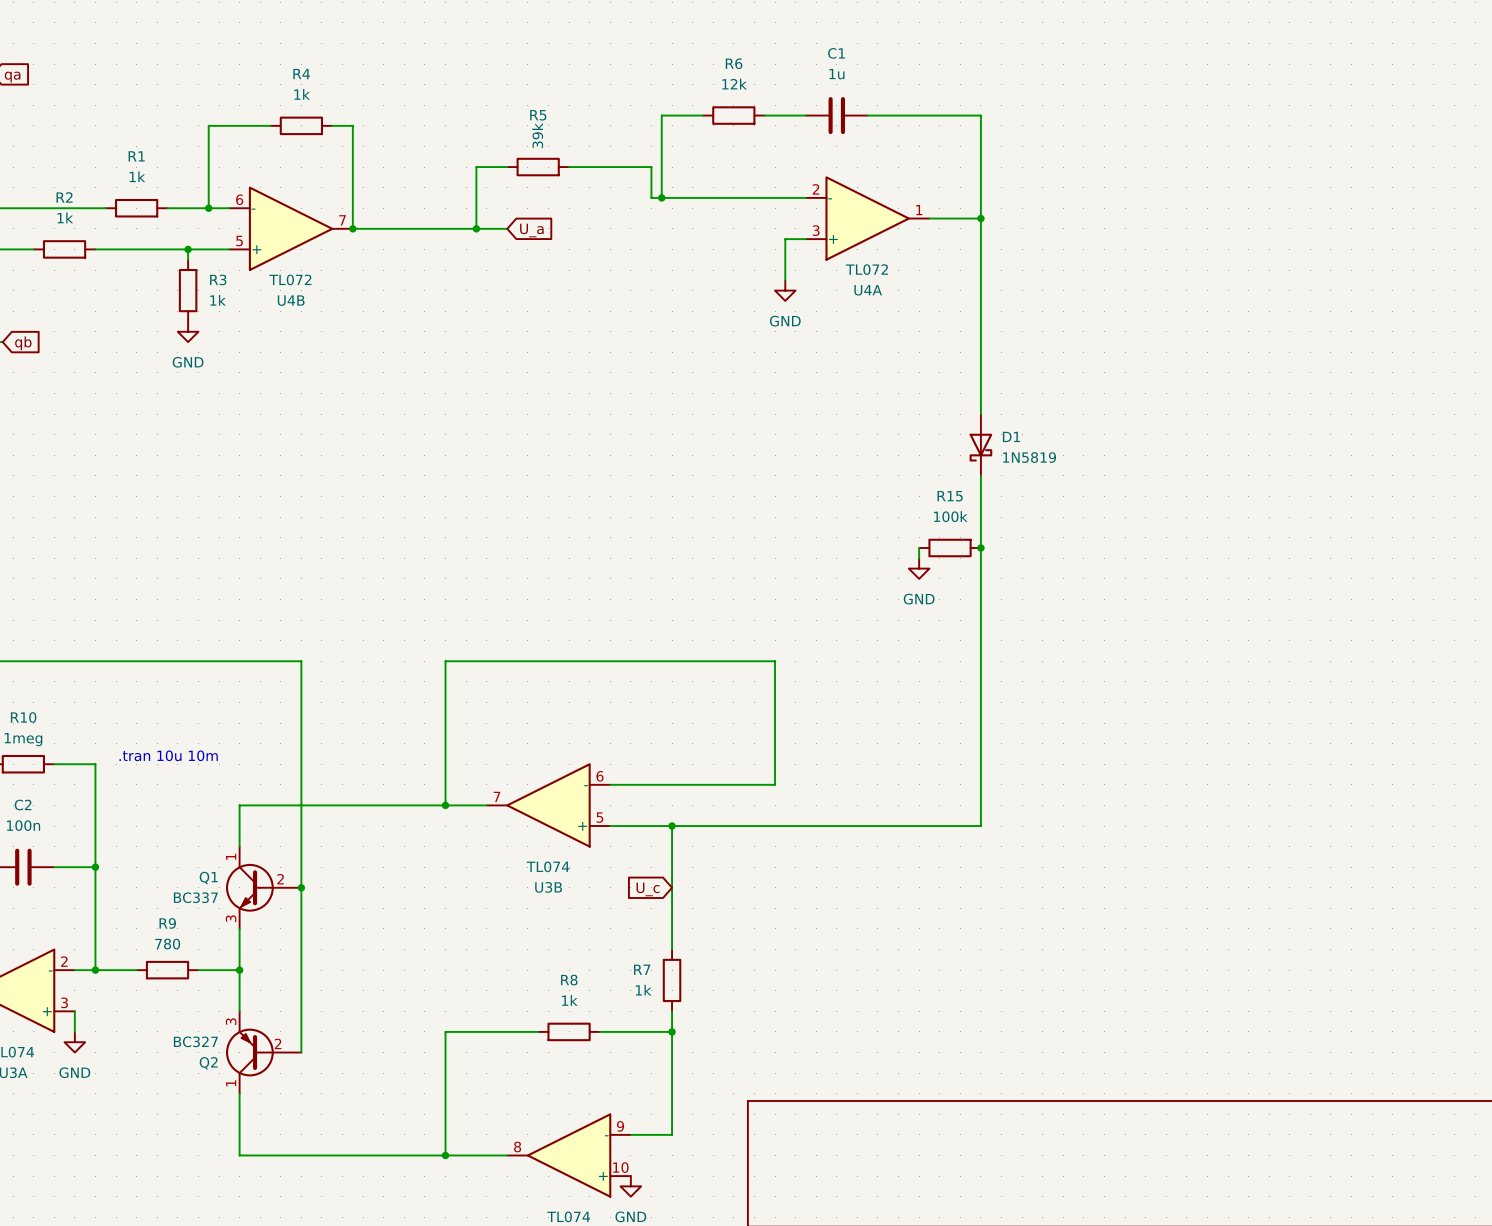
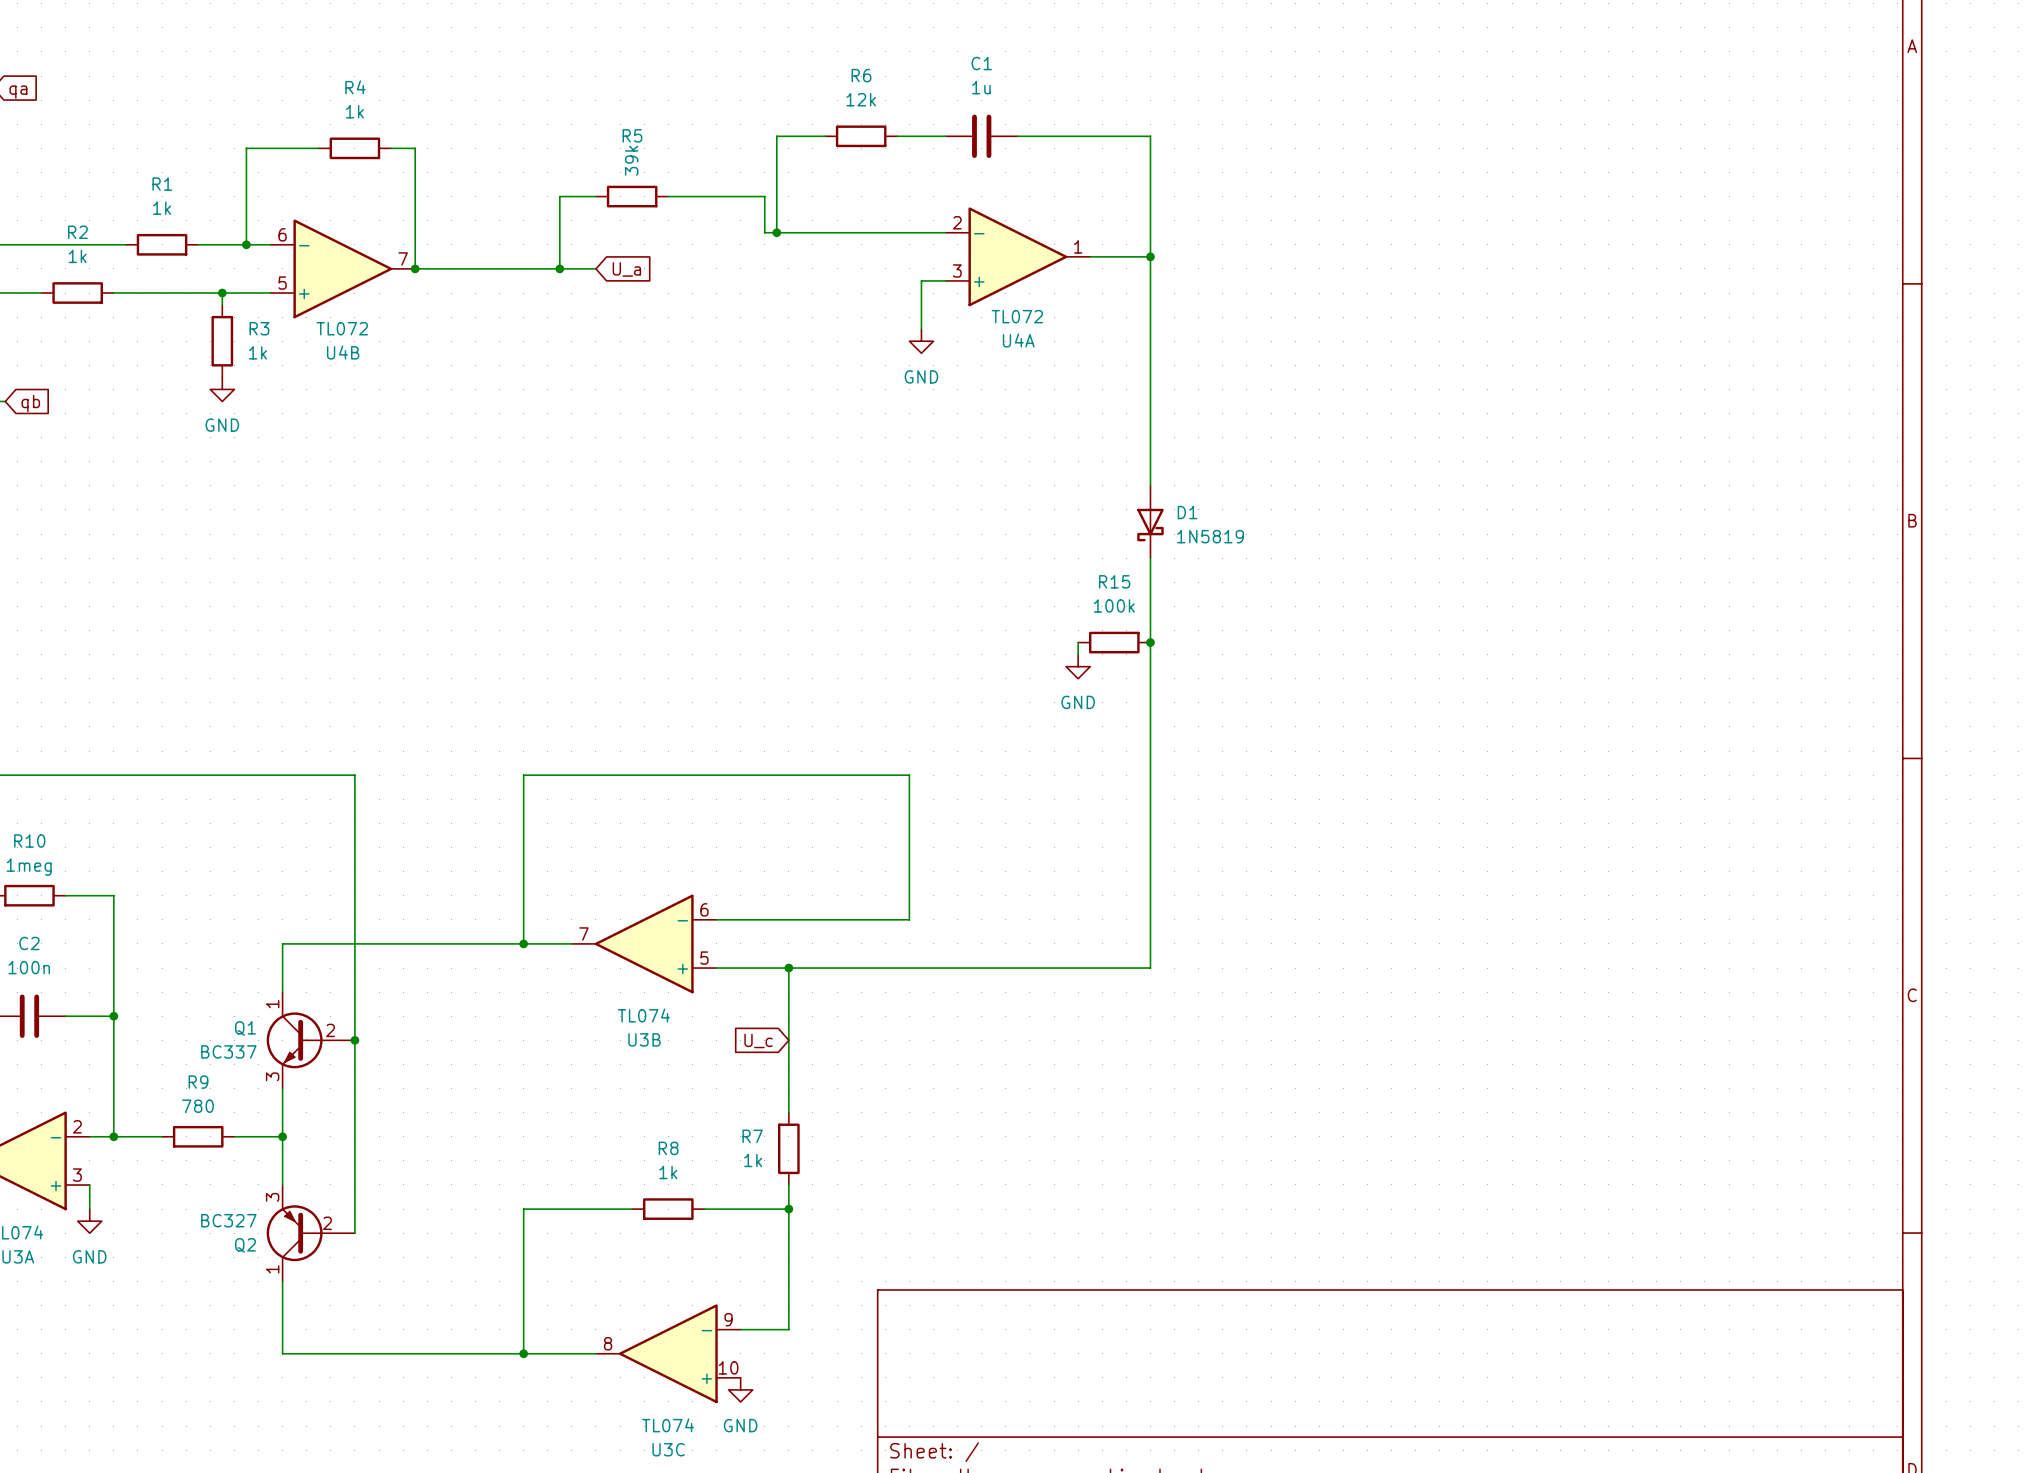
text: .tran 10u 10m (168, 755) -> none

